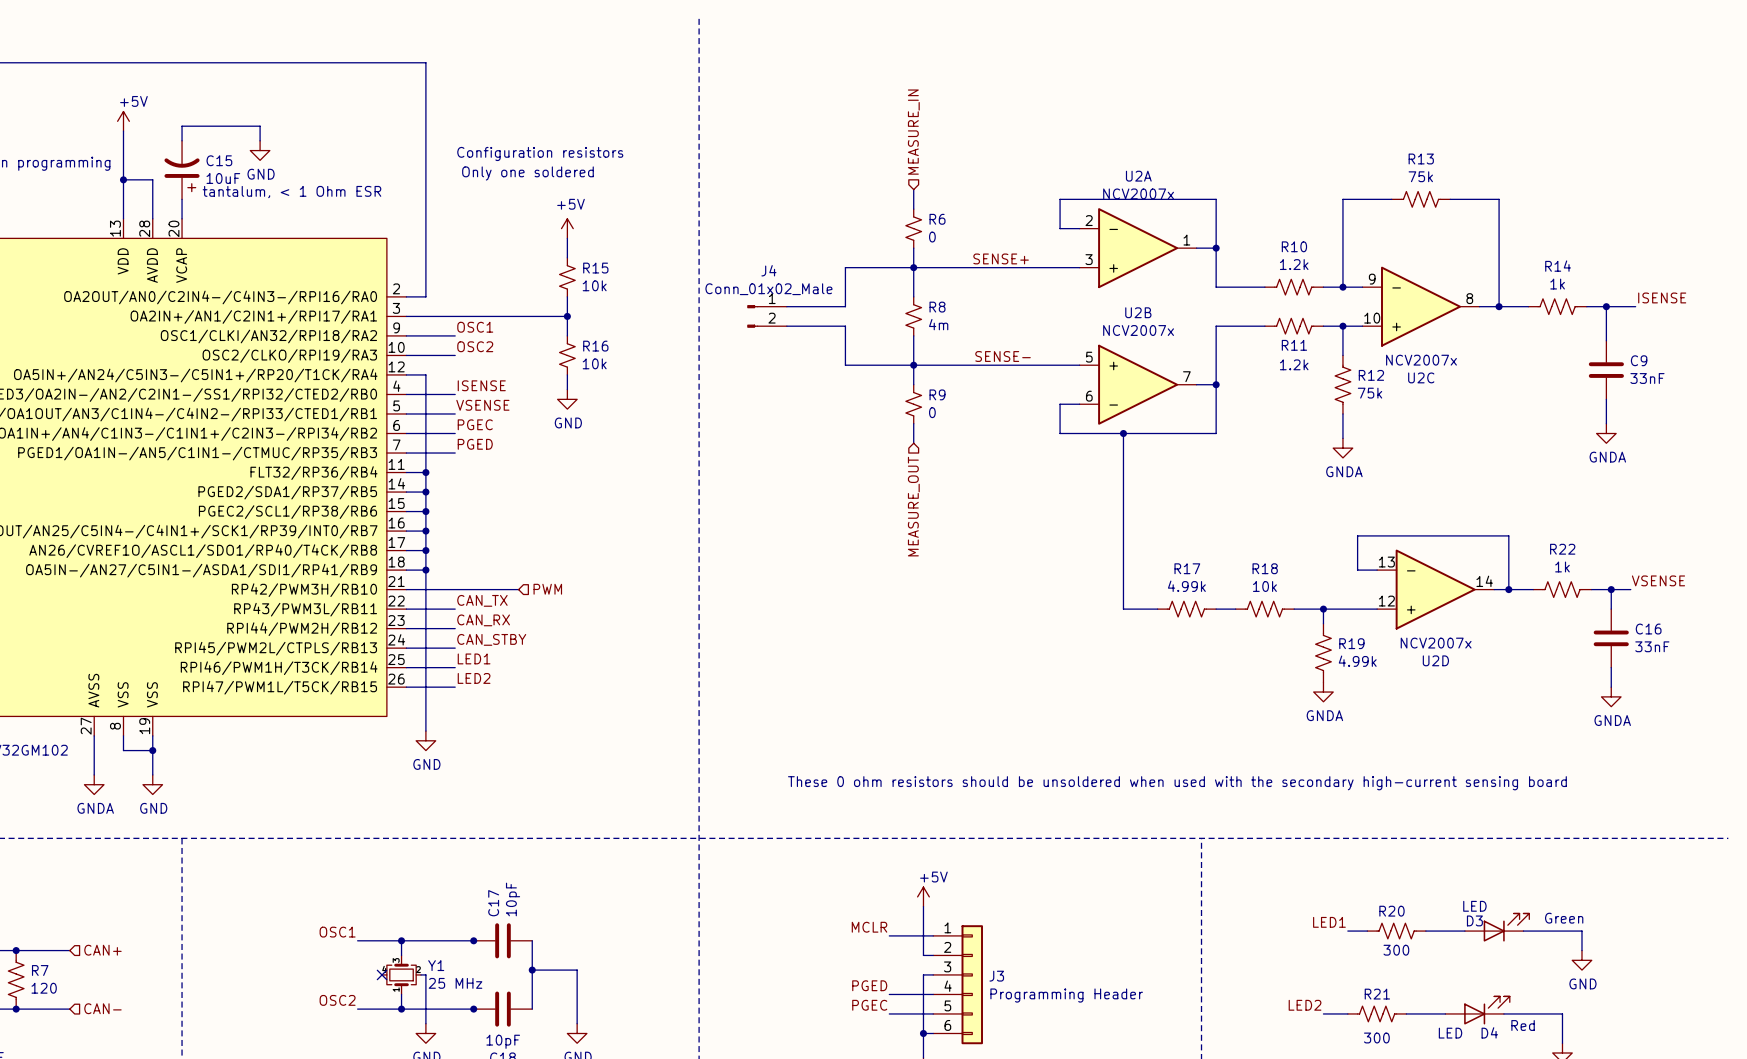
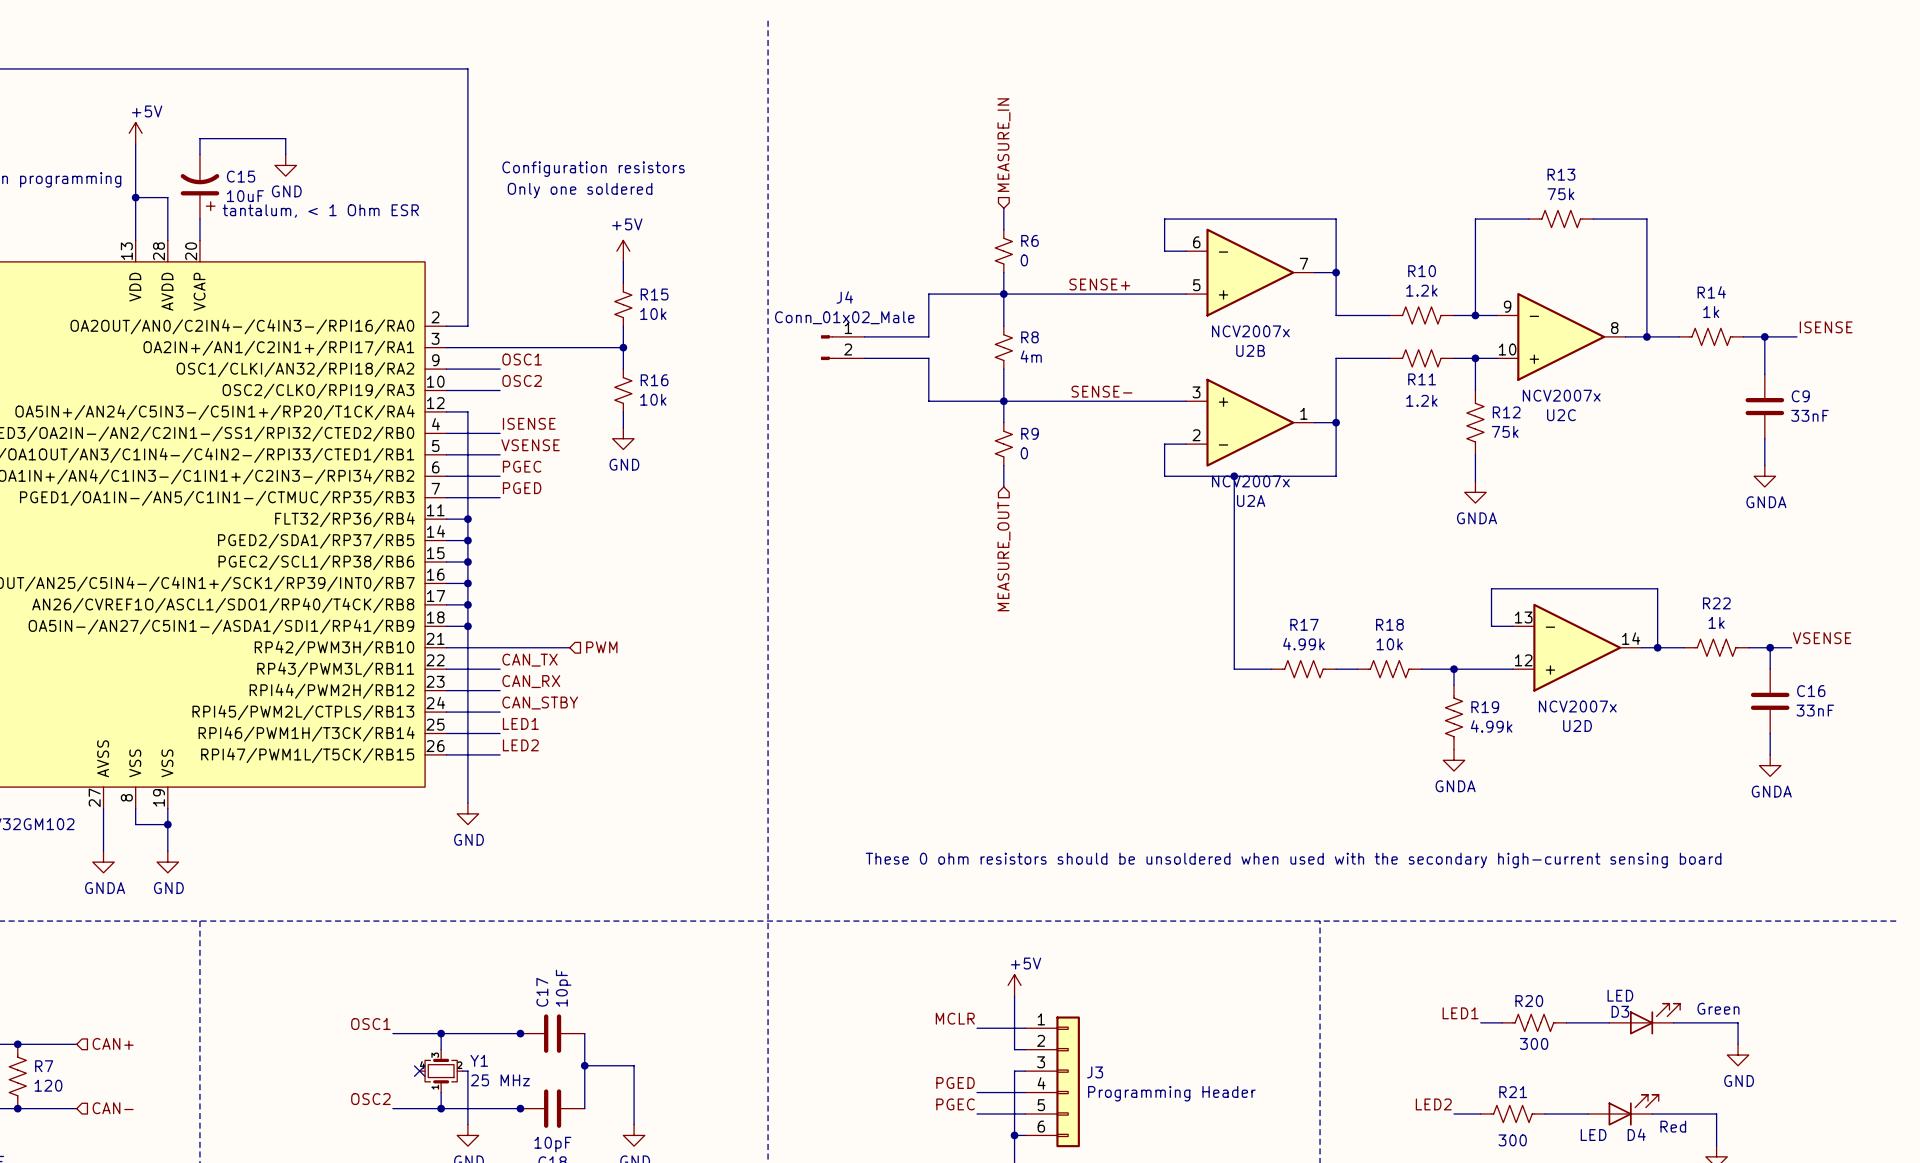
U2A flip: as is (1138, 248) -> up-down (1250, 422)
U2A position: (1138, 248) -> (1250, 422)
U2B flip: as is (1138, 384) -> up-down (1250, 272)
U2B position: (1138, 384) -> (1250, 272)

